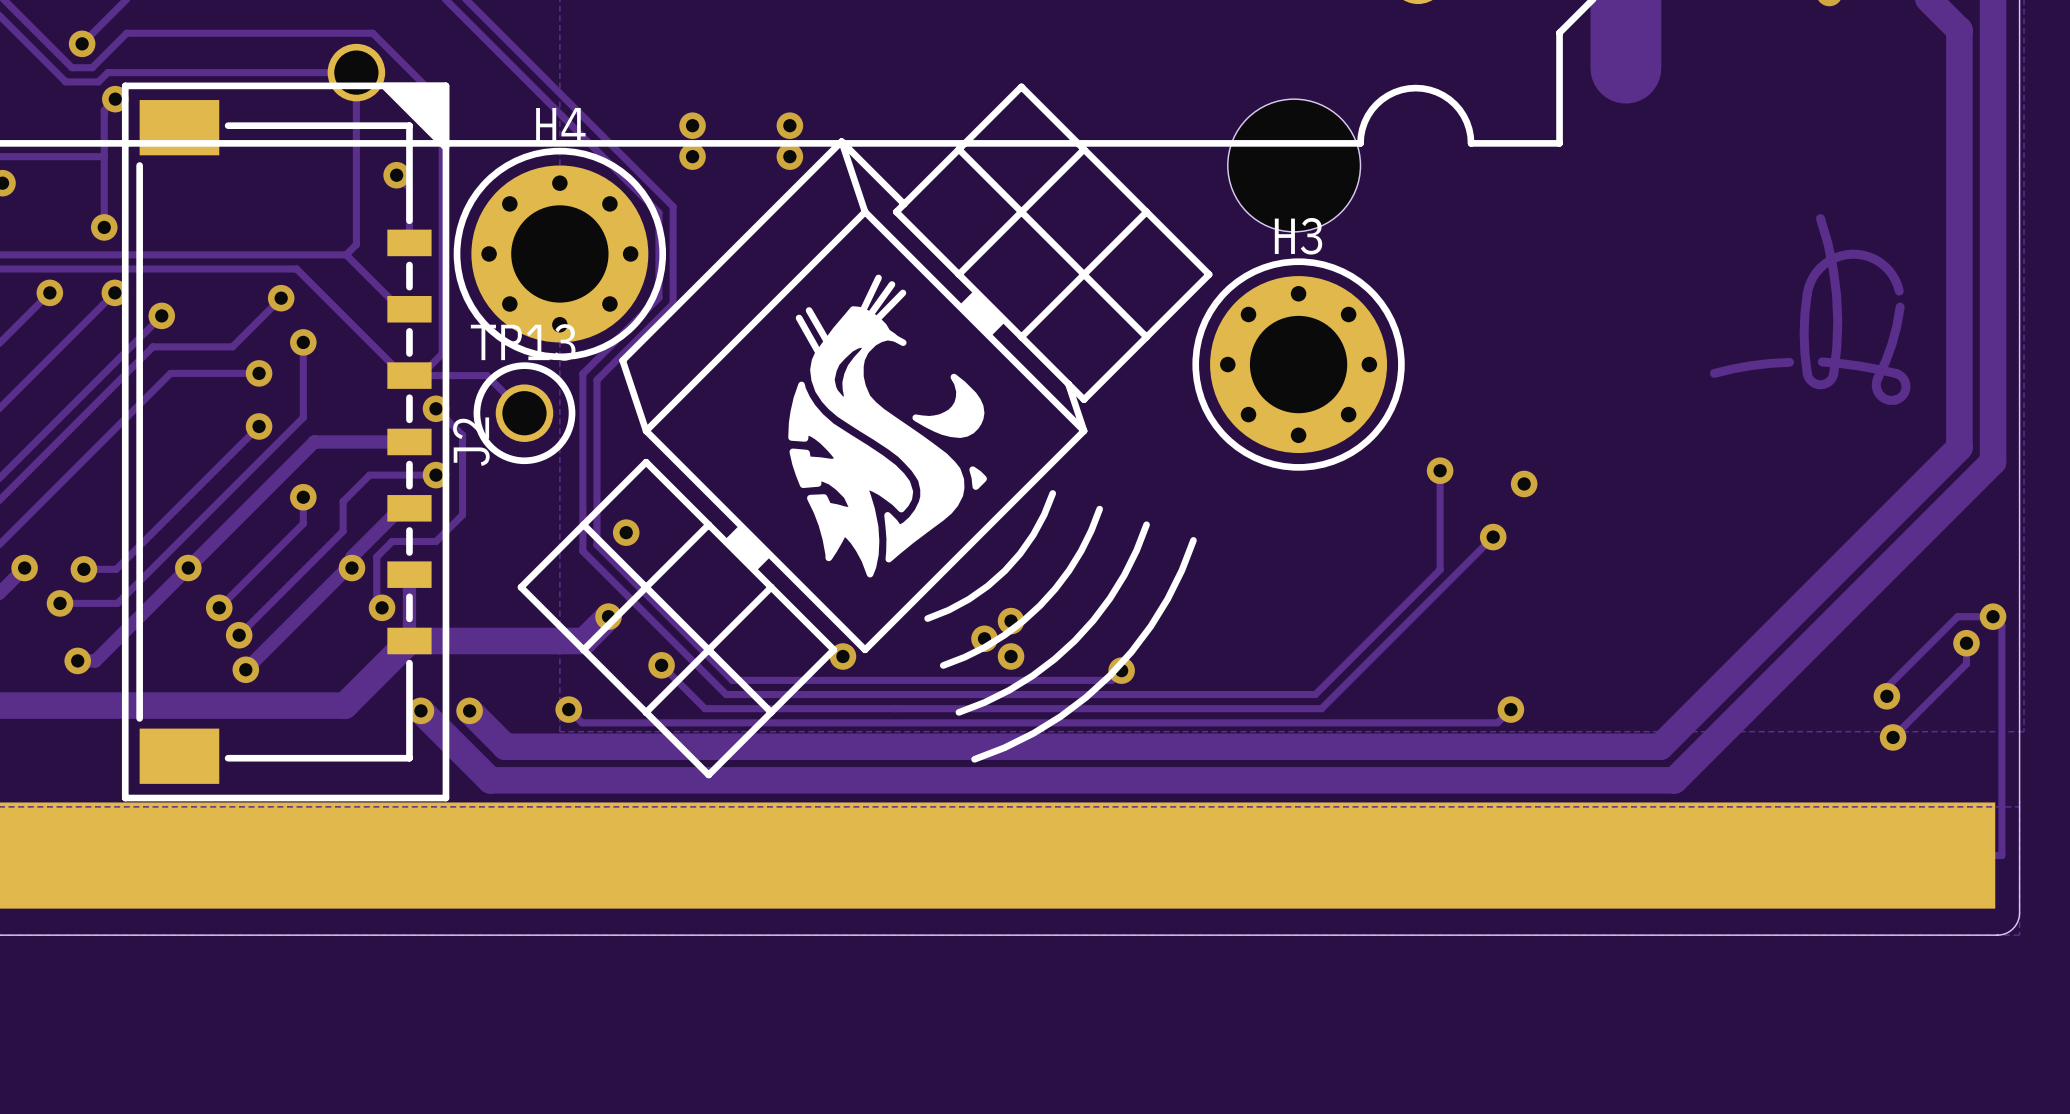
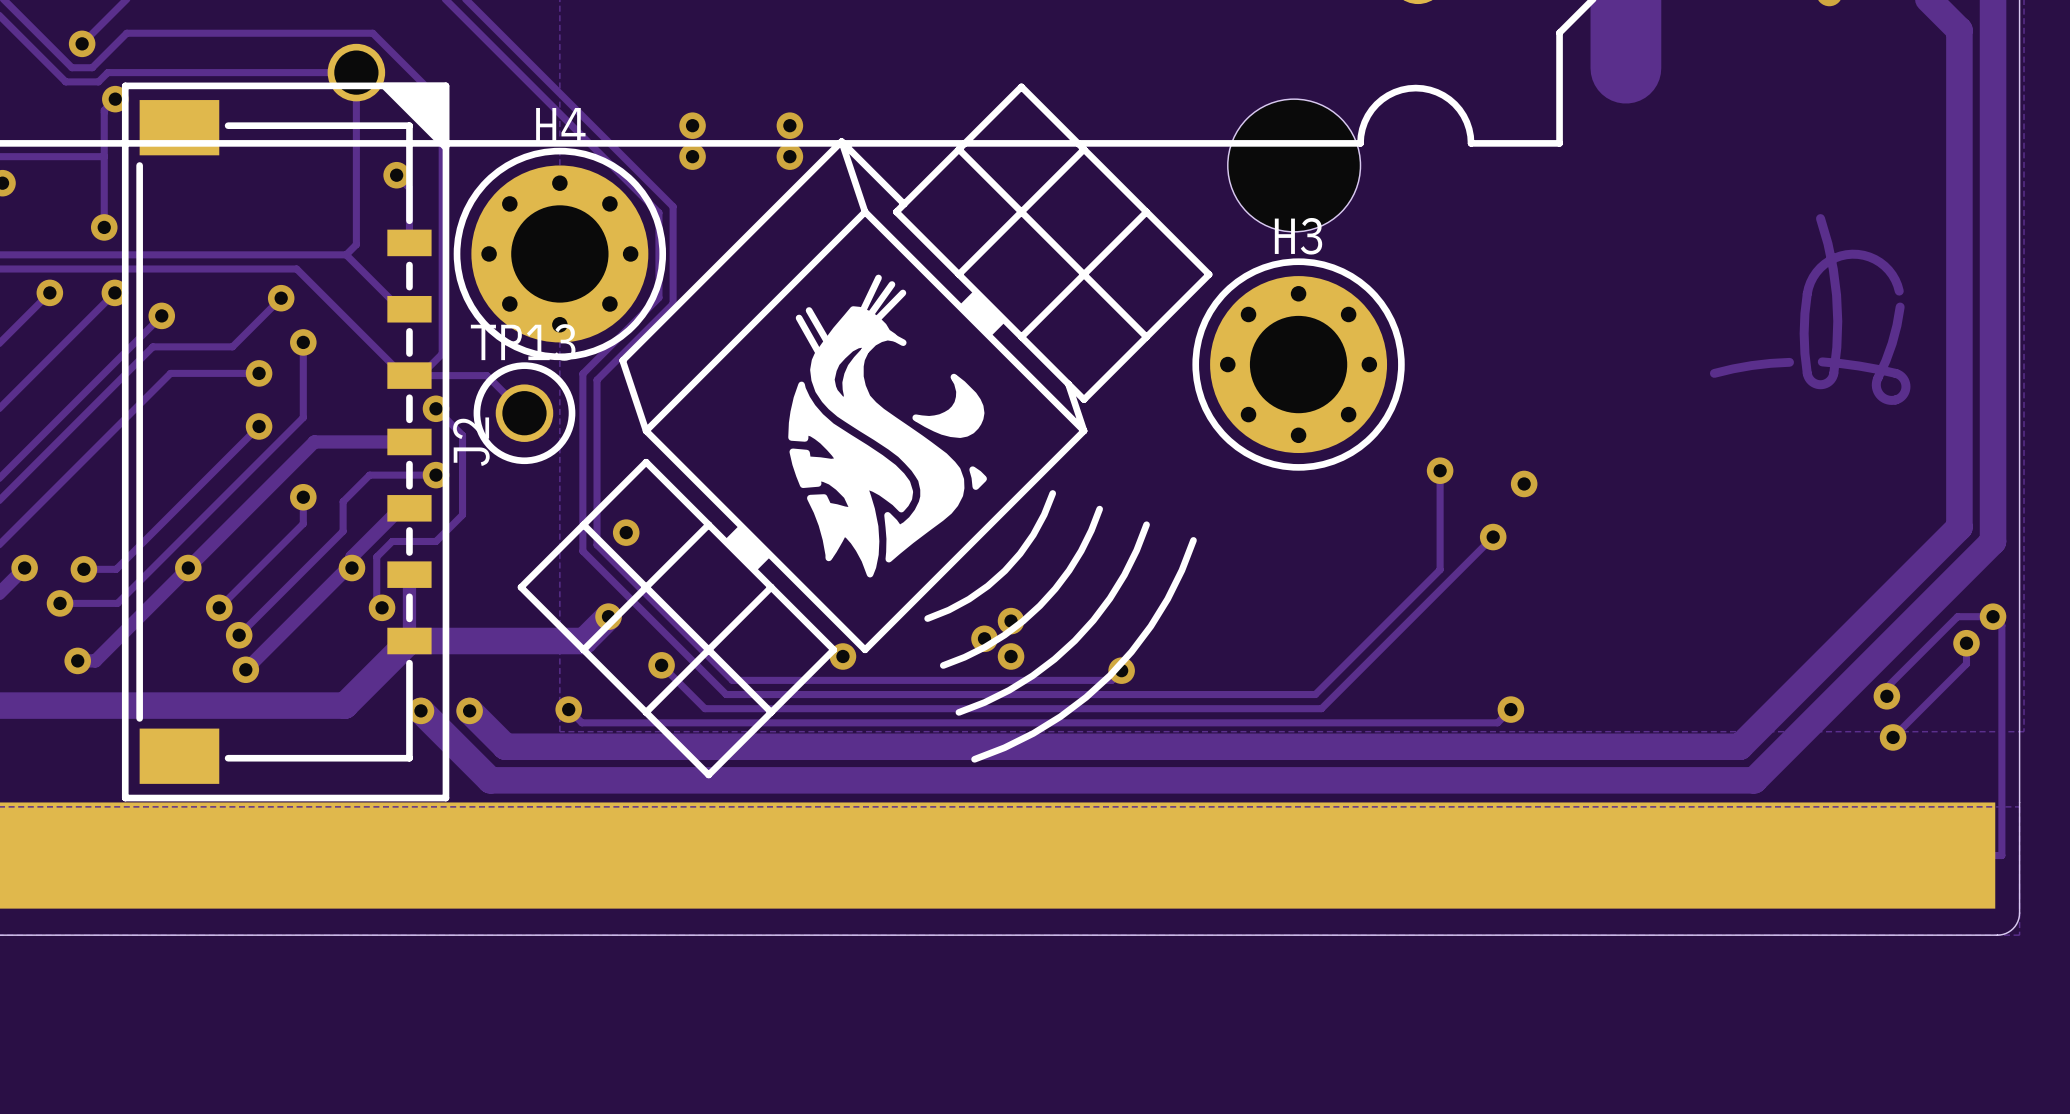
track: (1959, 447) (1660, 746) -> (1959, 447) (1959, 527) (1740, 746) (1660, 746)
track: (1993, 461) (1674, 780) -> (1993, 461) (1993, 541) (1754, 780) (1674, 780)

